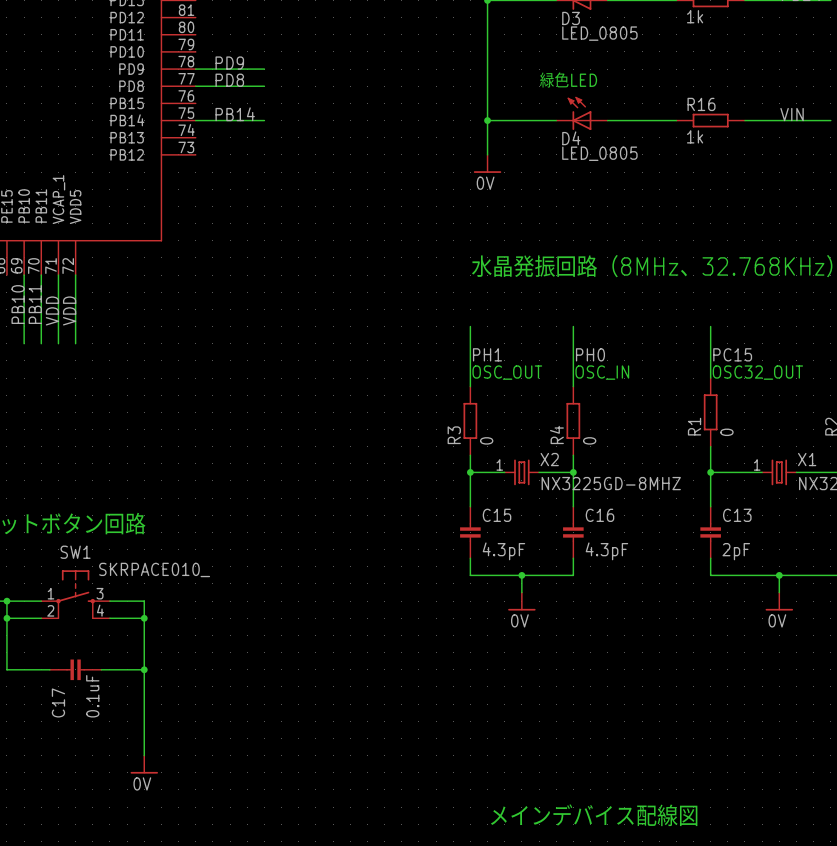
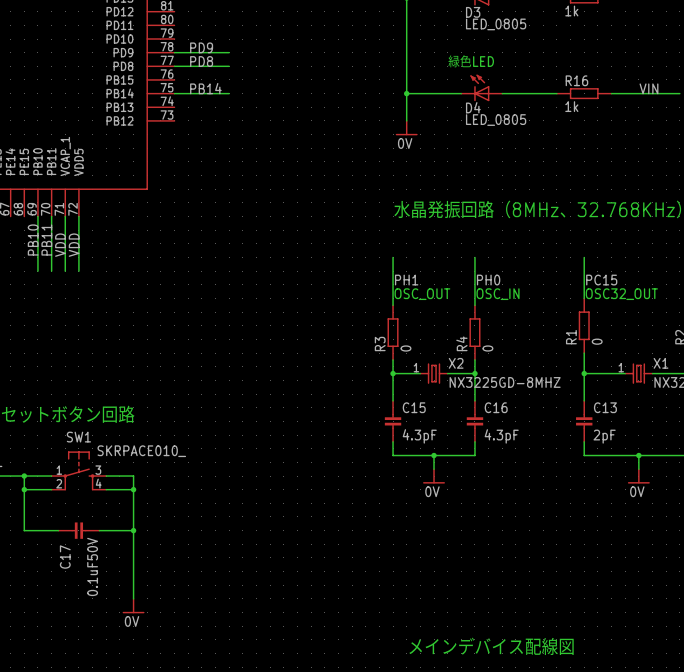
C17 value: 0.1uF (92, 696) -> 0.1uF50V (92, 566)

